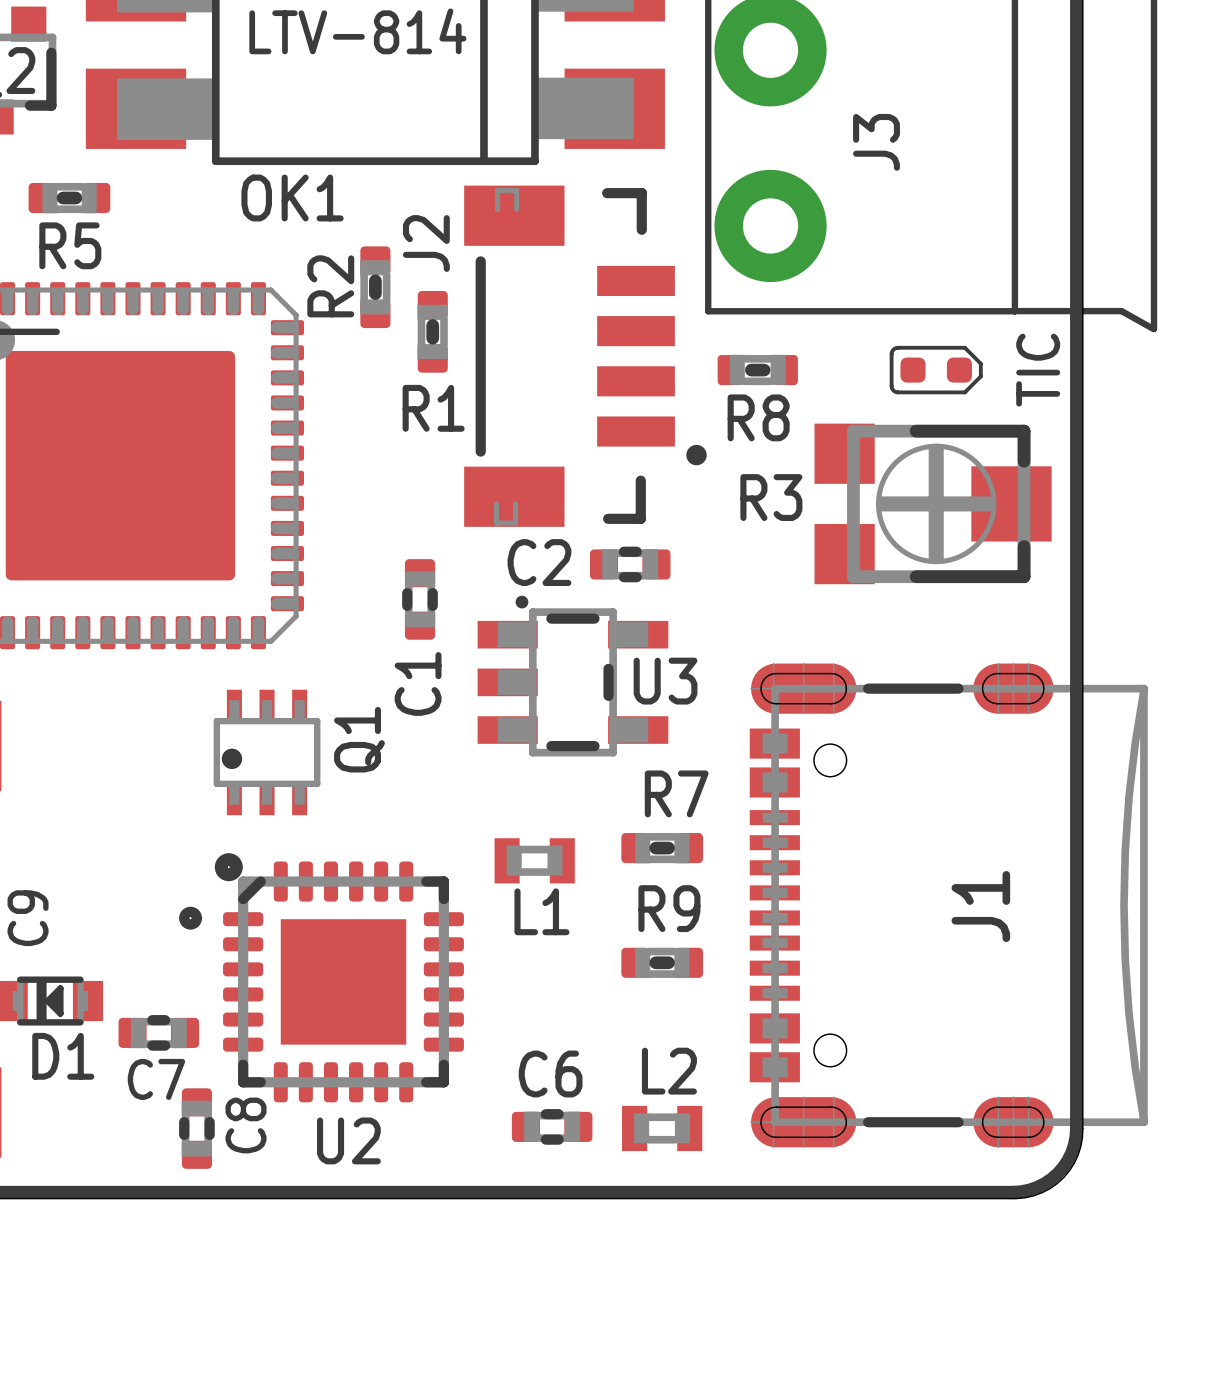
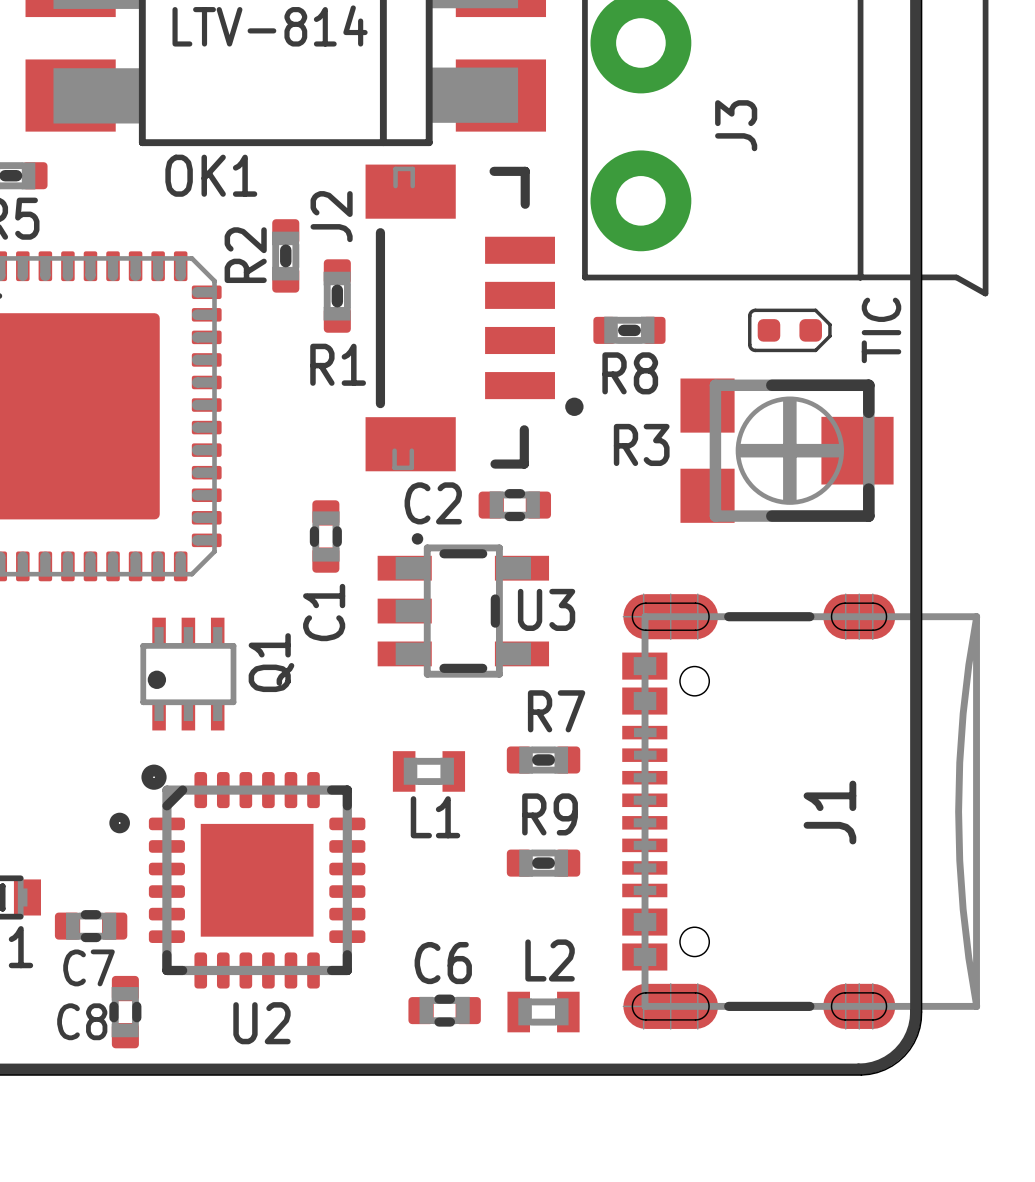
C8 name rotation: 0° (246, 1125) -> 90° clockwise (82, 1021)
C8 name position: C8 (246, 1125) -> C8 (82, 1021)

